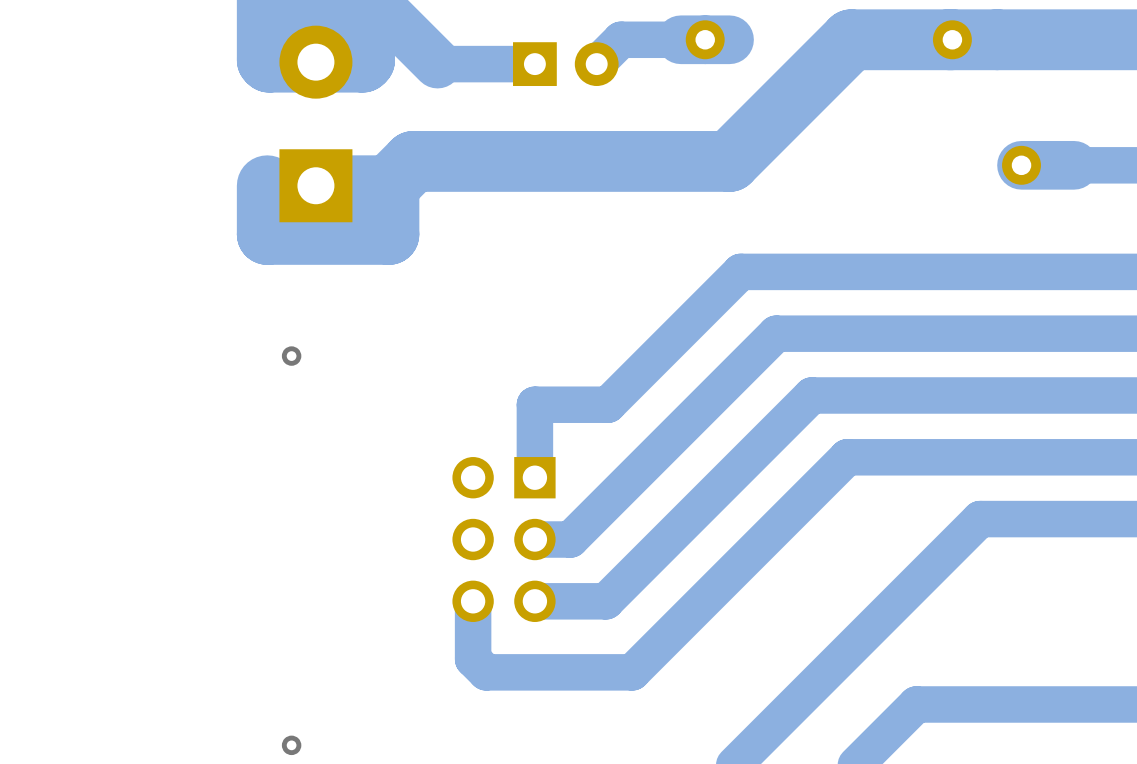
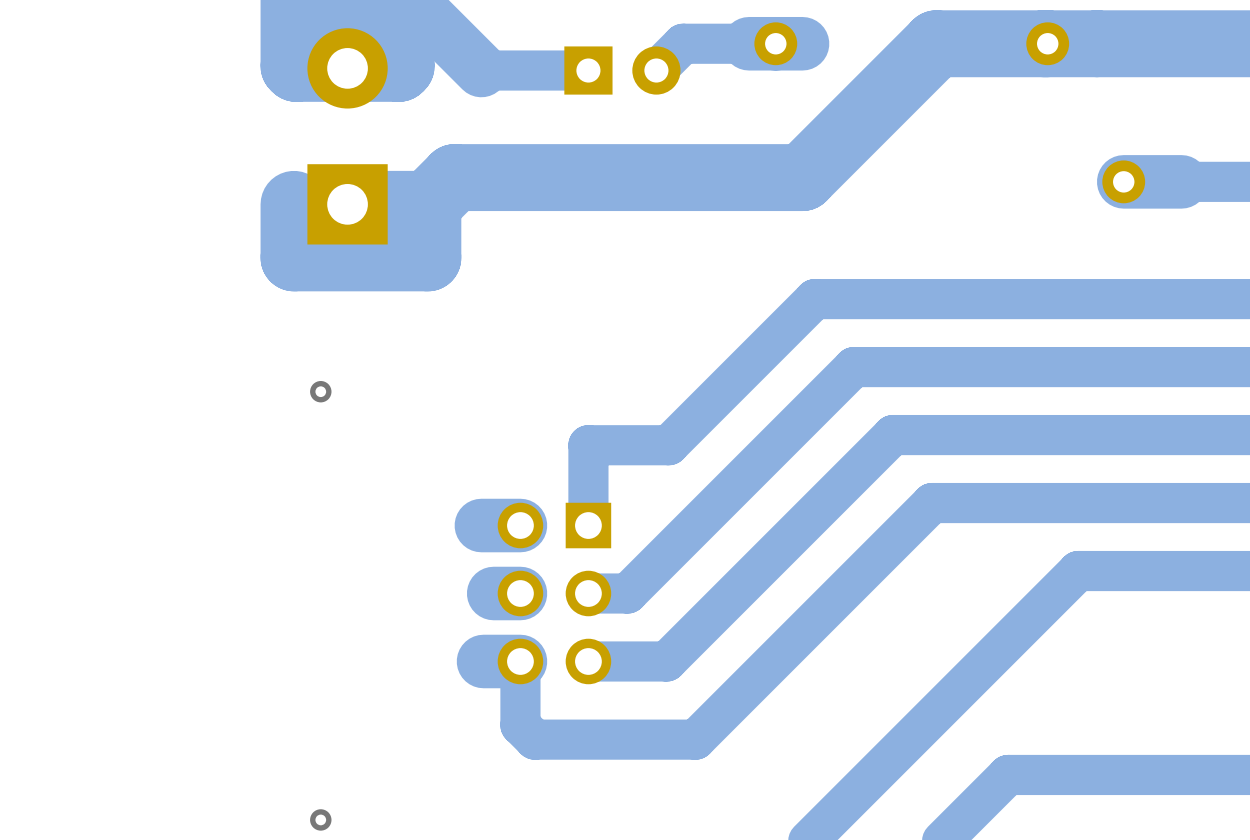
bottom track: none -> (520, 525) (481, 525)
bottom track: none -> (520, 593) (493, 593)
bottom track: none -> (520, 661) (483, 661)

